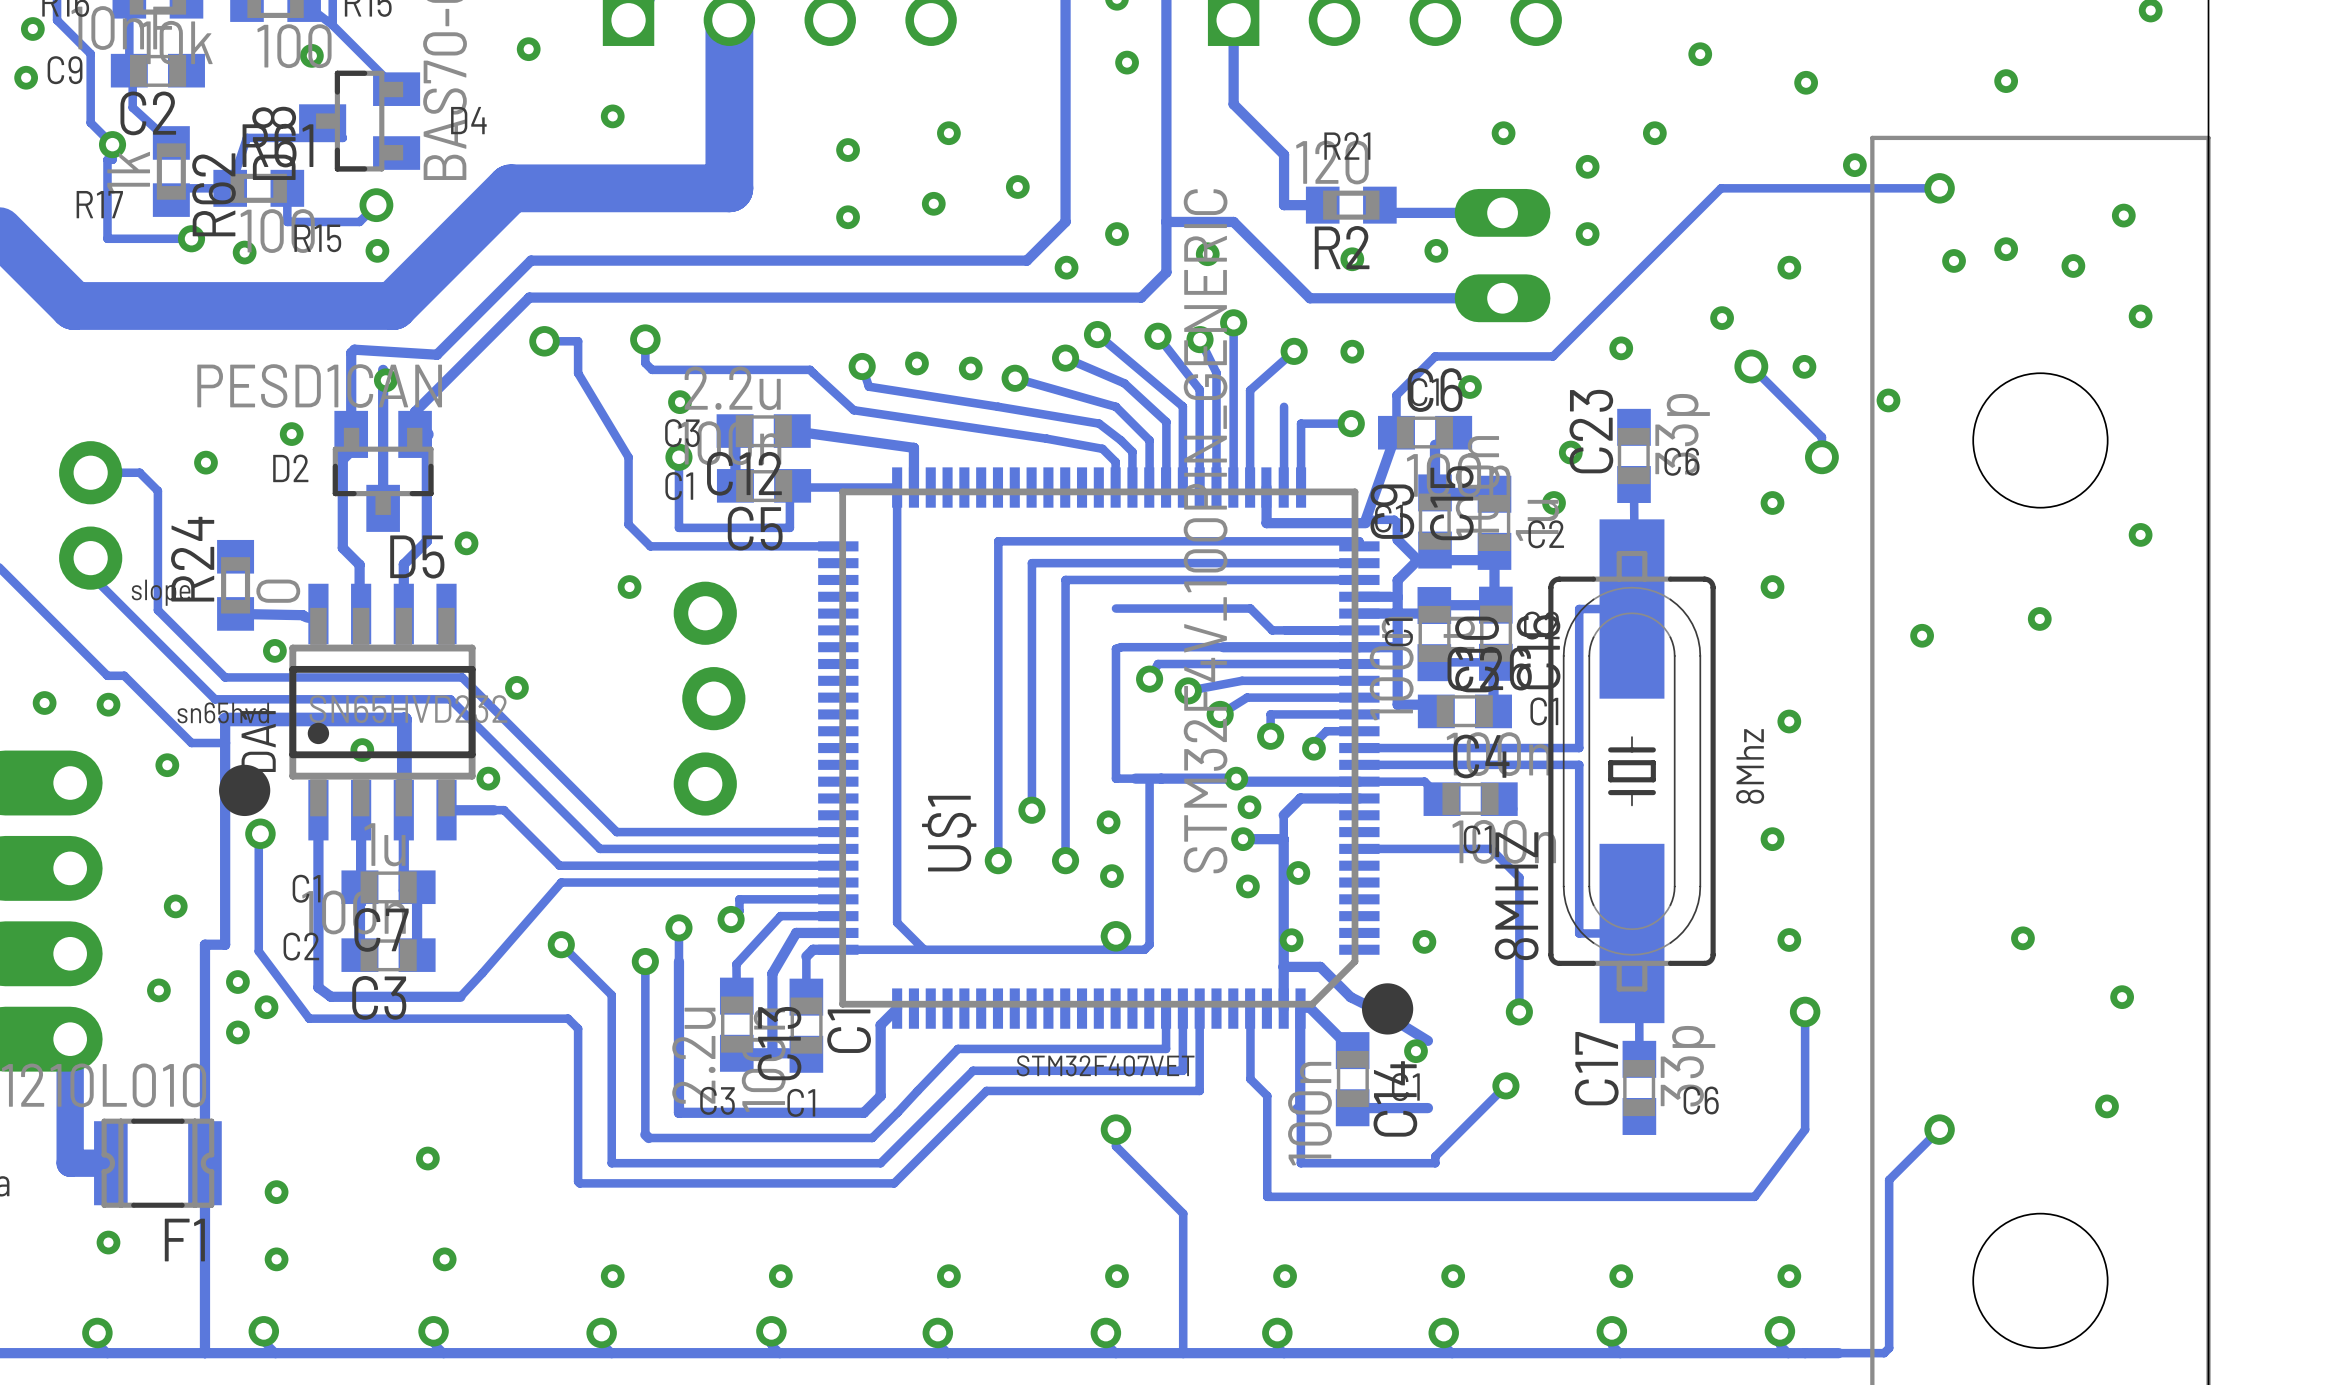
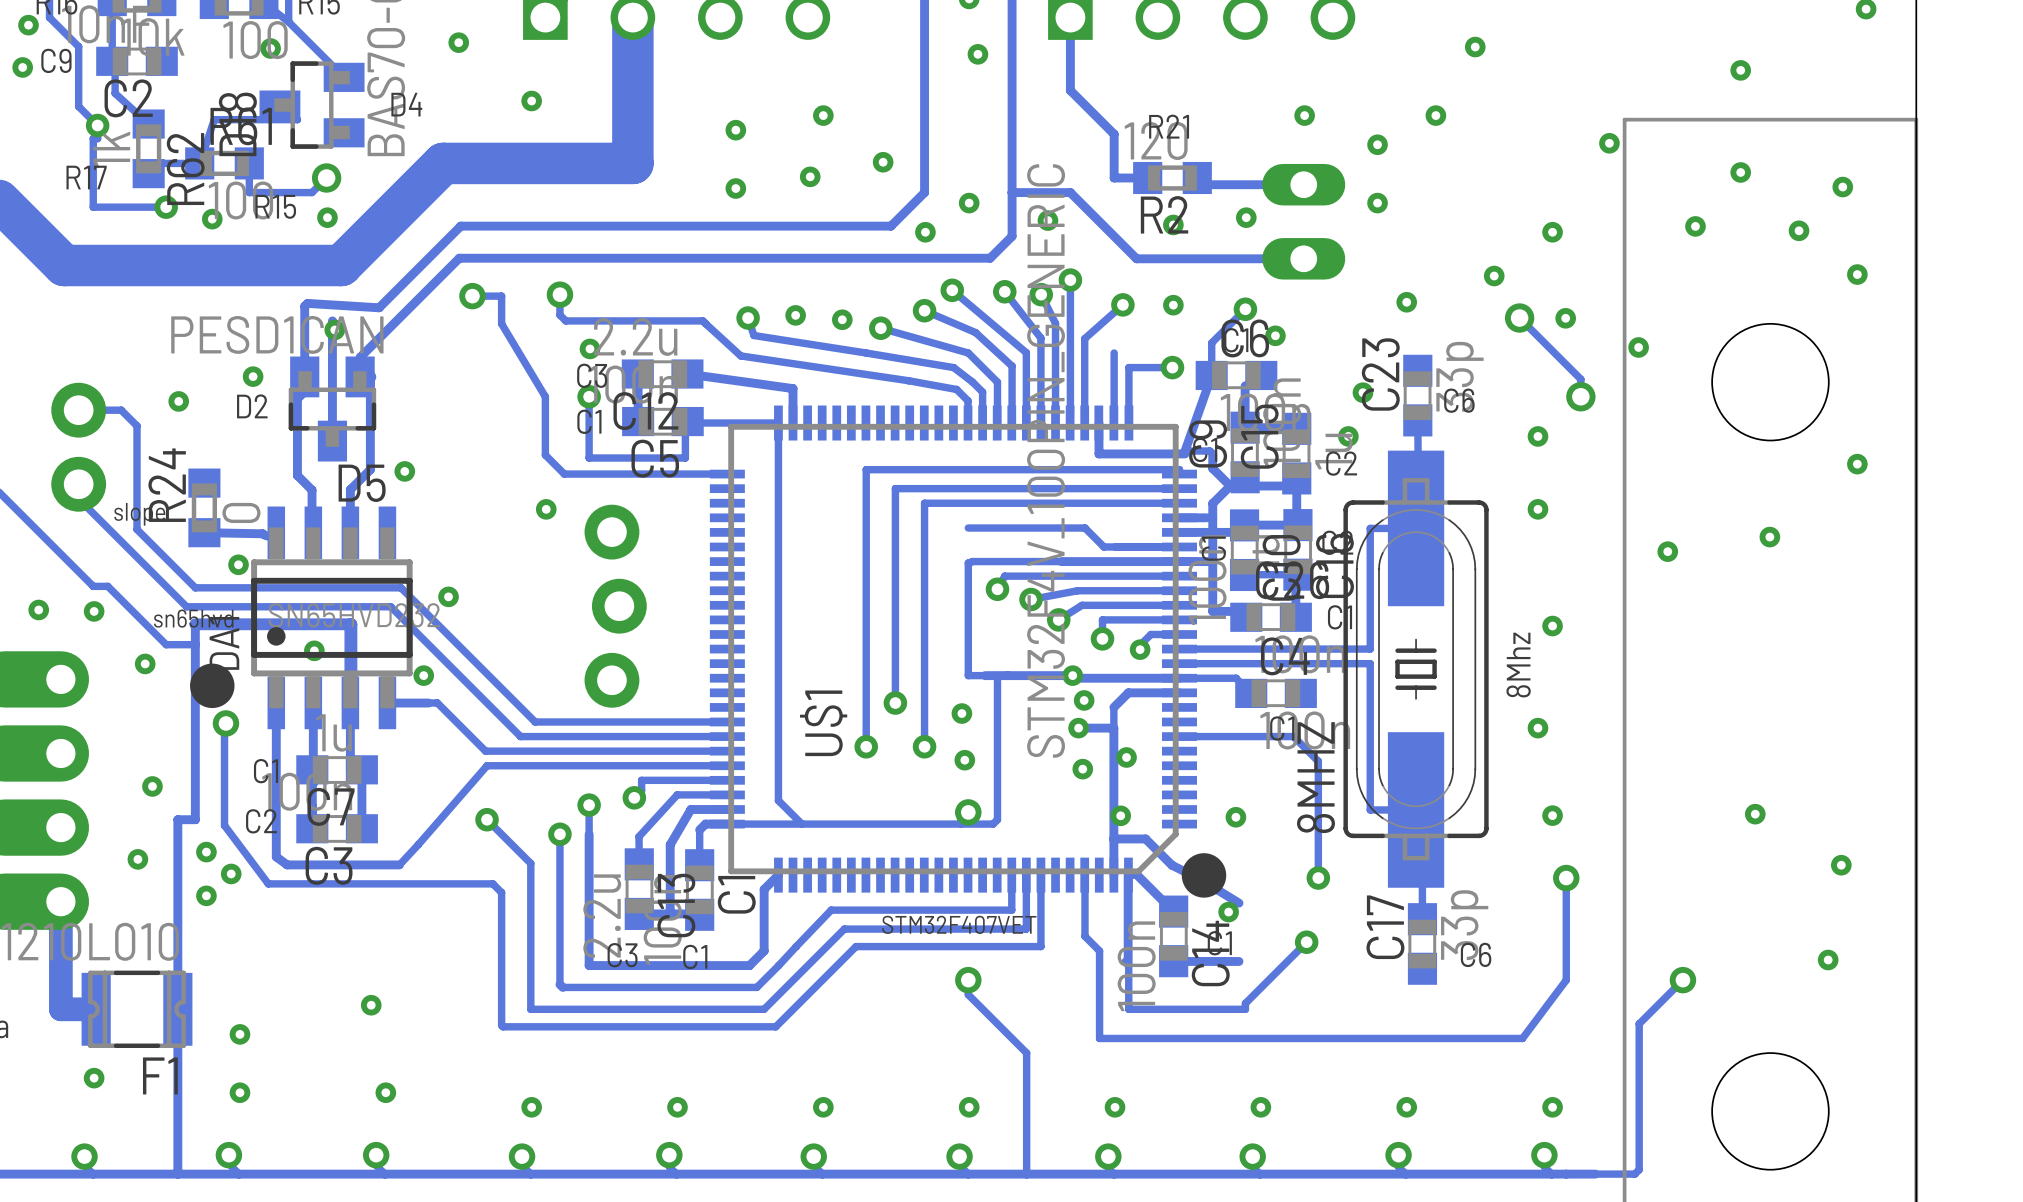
via: (1806, 82) -> none
track: (1939, 188) (1721, 188) (1552, 356) (1435, 356) -> none
via: (1939, 188) -> none
via position: (2006, 249) -> (1740, 172)
via: none -> (1245, 309)

